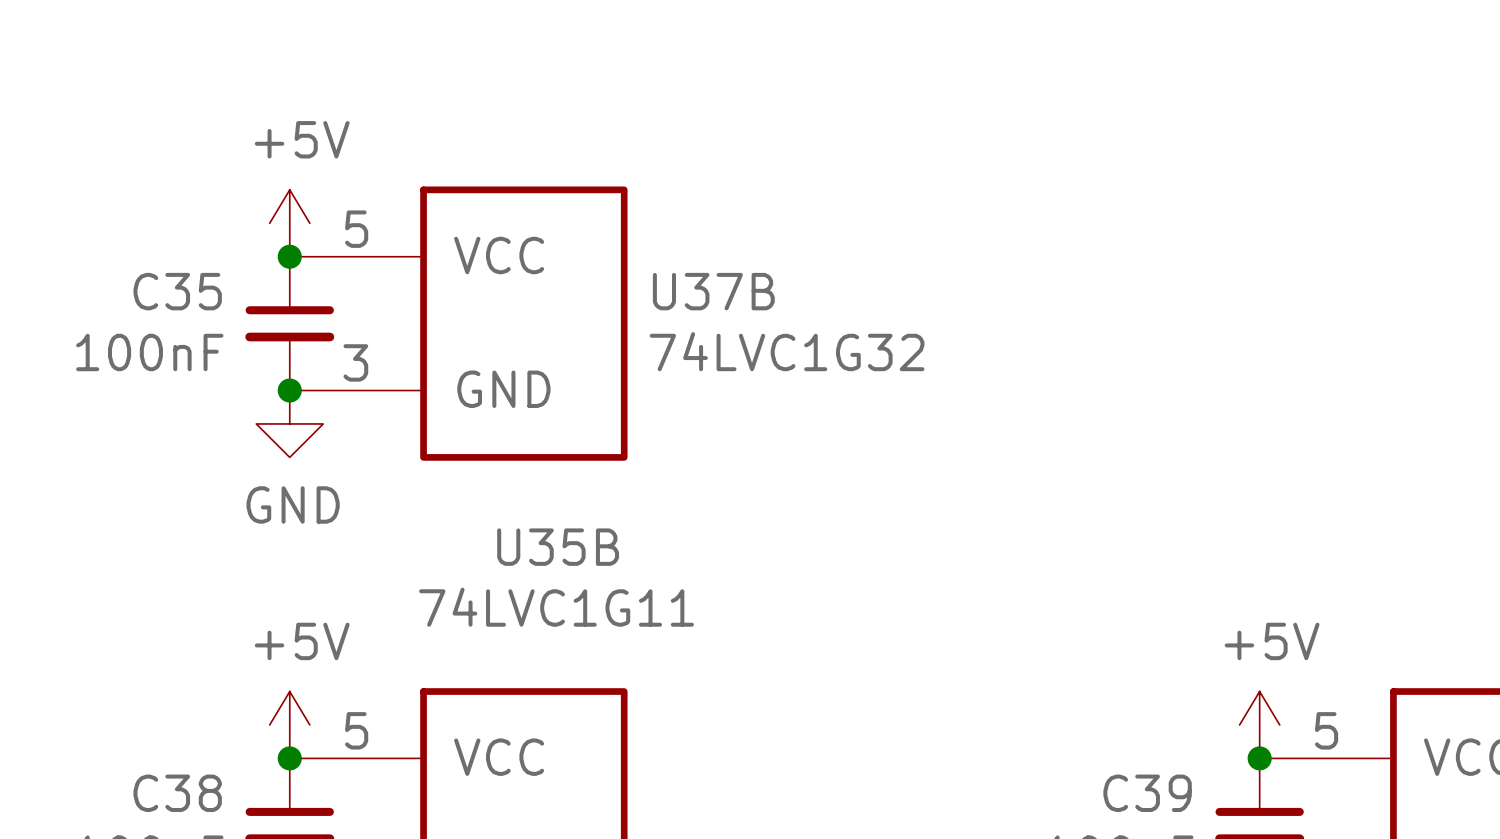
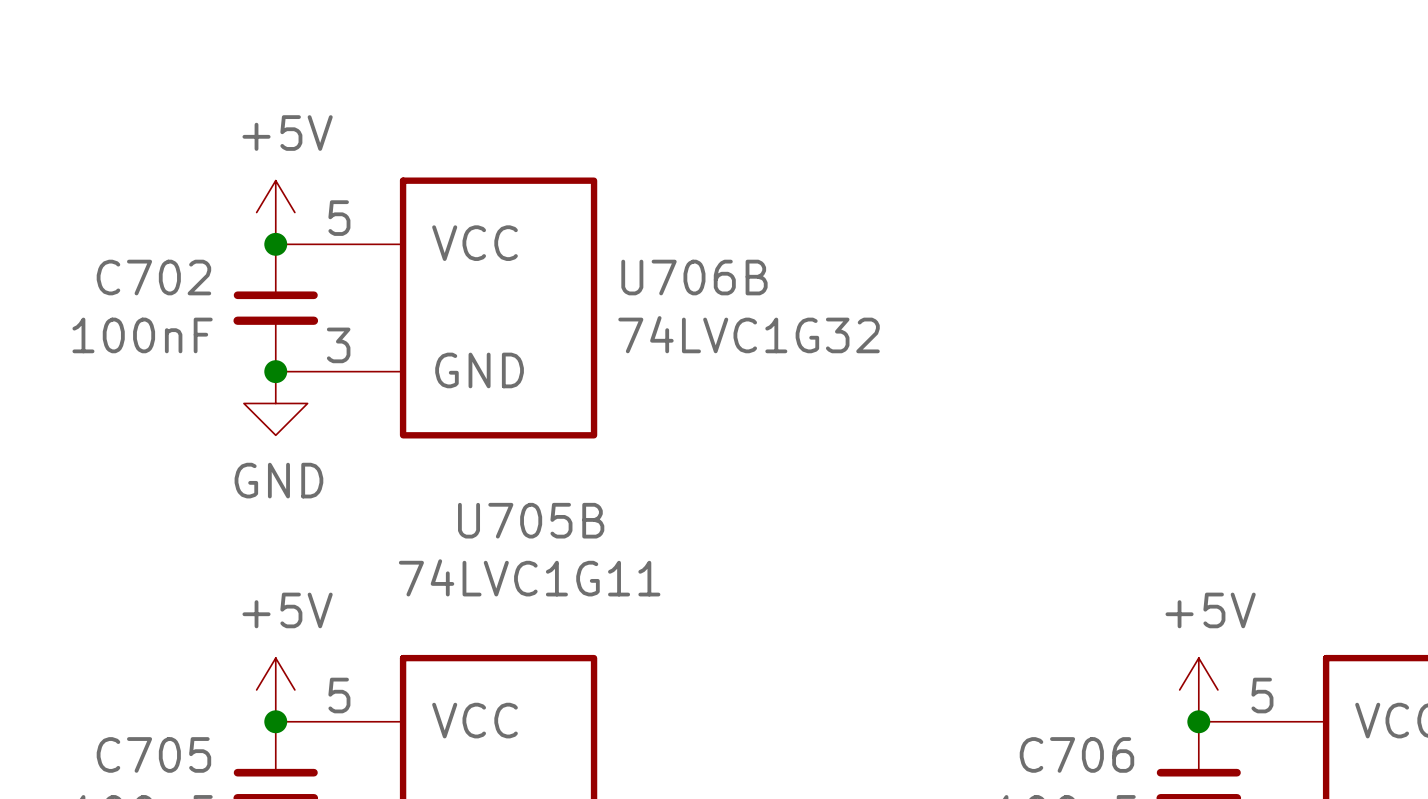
C35 name: C35 (177, 291) -> C702 (153, 277)
U37B name: U37B (713, 291) -> U706B (694, 277)
U35B name: U35B (558, 547) -> U705B (531, 520)
C38 name: C38 (177, 793) -> C705 (153, 754)
C39 name: C39 (1147, 793) -> C706 (1076, 754)

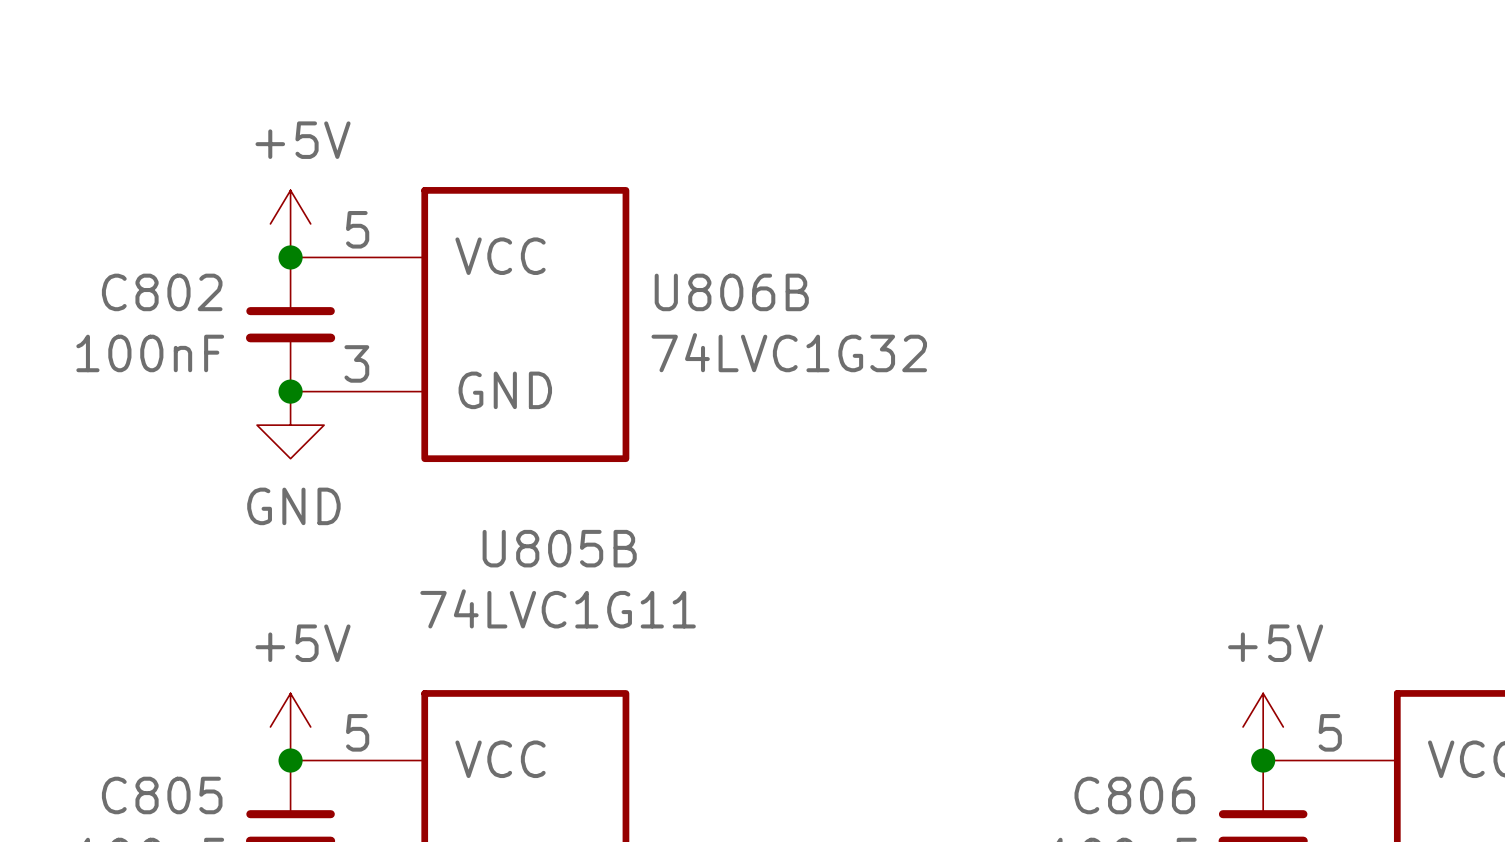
C702 name: C702 (153, 277) -> C802 (162, 292)
U706B name: U706B (694, 277) -> U806B (731, 292)
U705B name: U705B (531, 520) -> U805B (559, 548)
C705 name: C705 (153, 754) -> C805 (162, 795)
C706 name: C706 (1076, 754) -> C806 (1134, 795)

